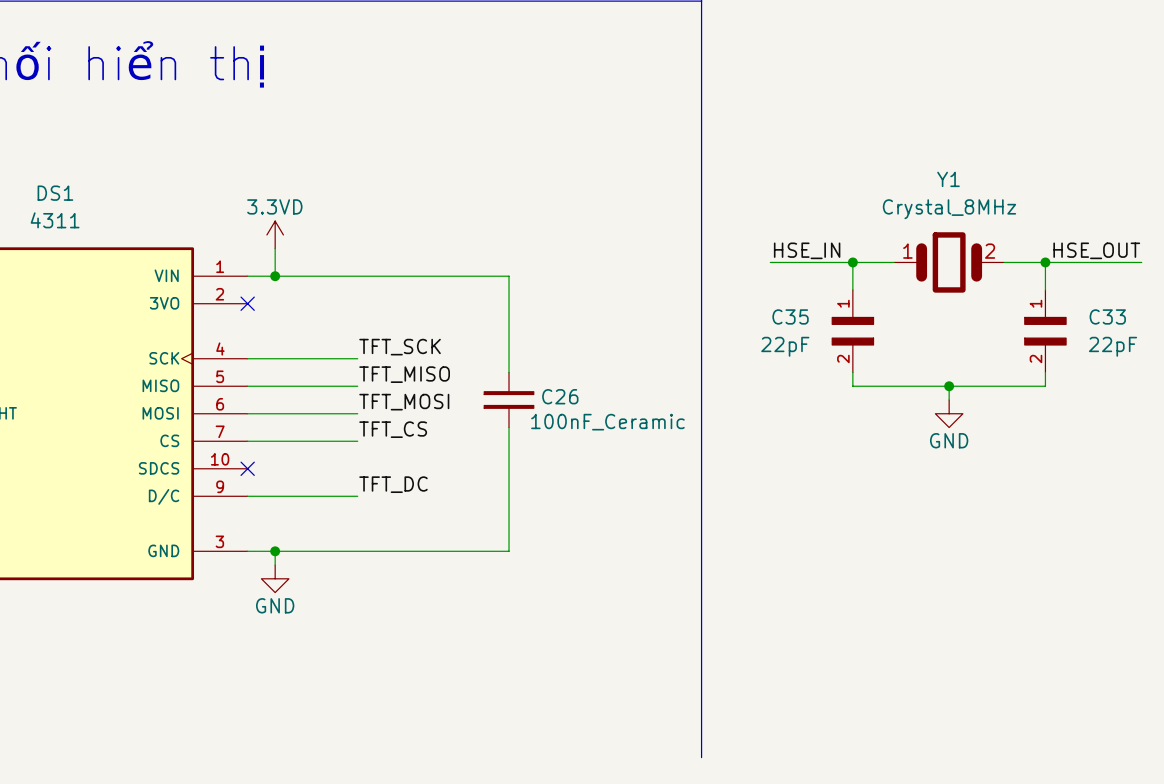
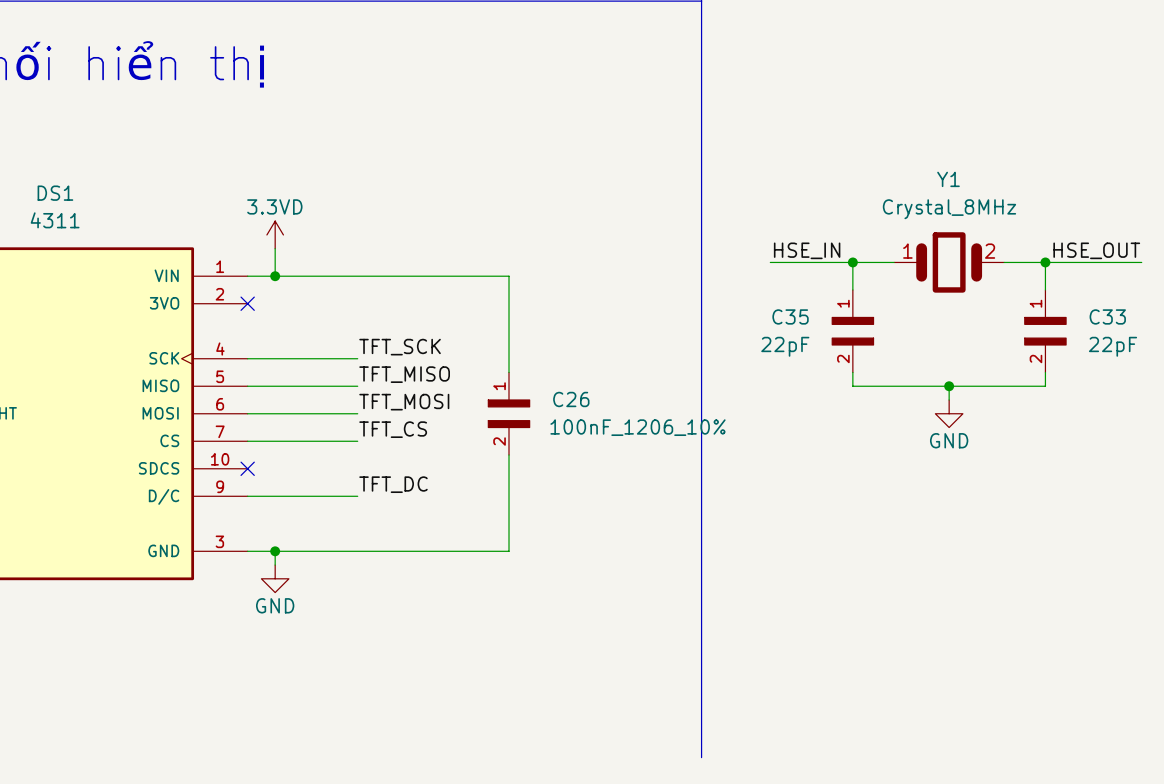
C26 symbol: [484, 372, 534, 428] -> [487, 372, 531, 456]
C26 value: 100nF_Ceramic (607, 422) -> 100nF_1206_10% (638, 427)

